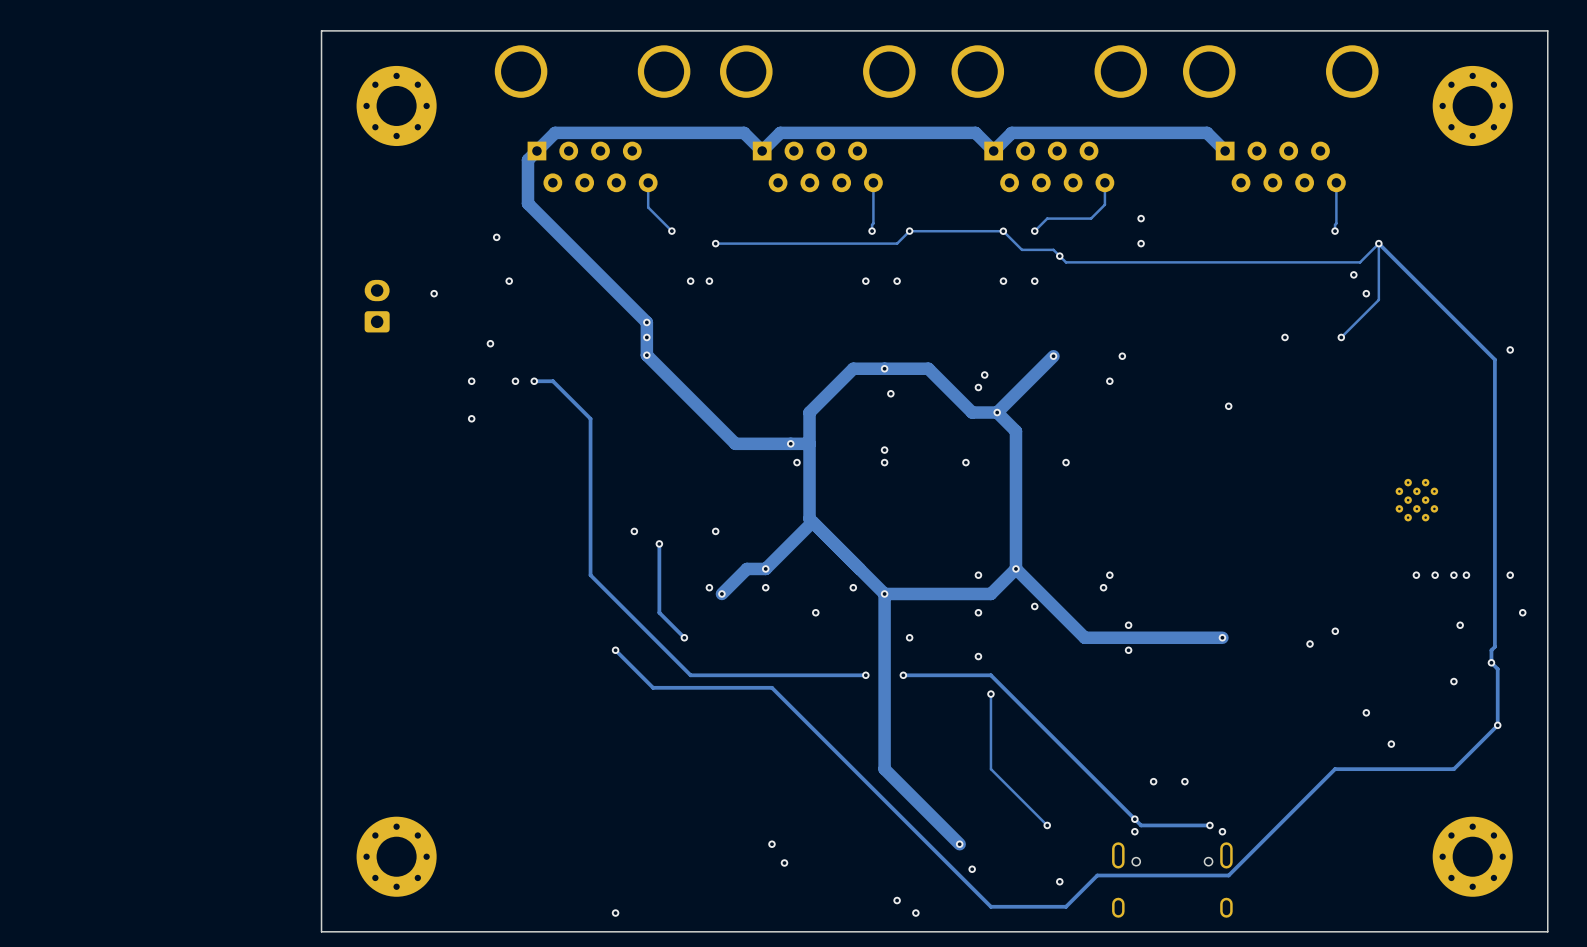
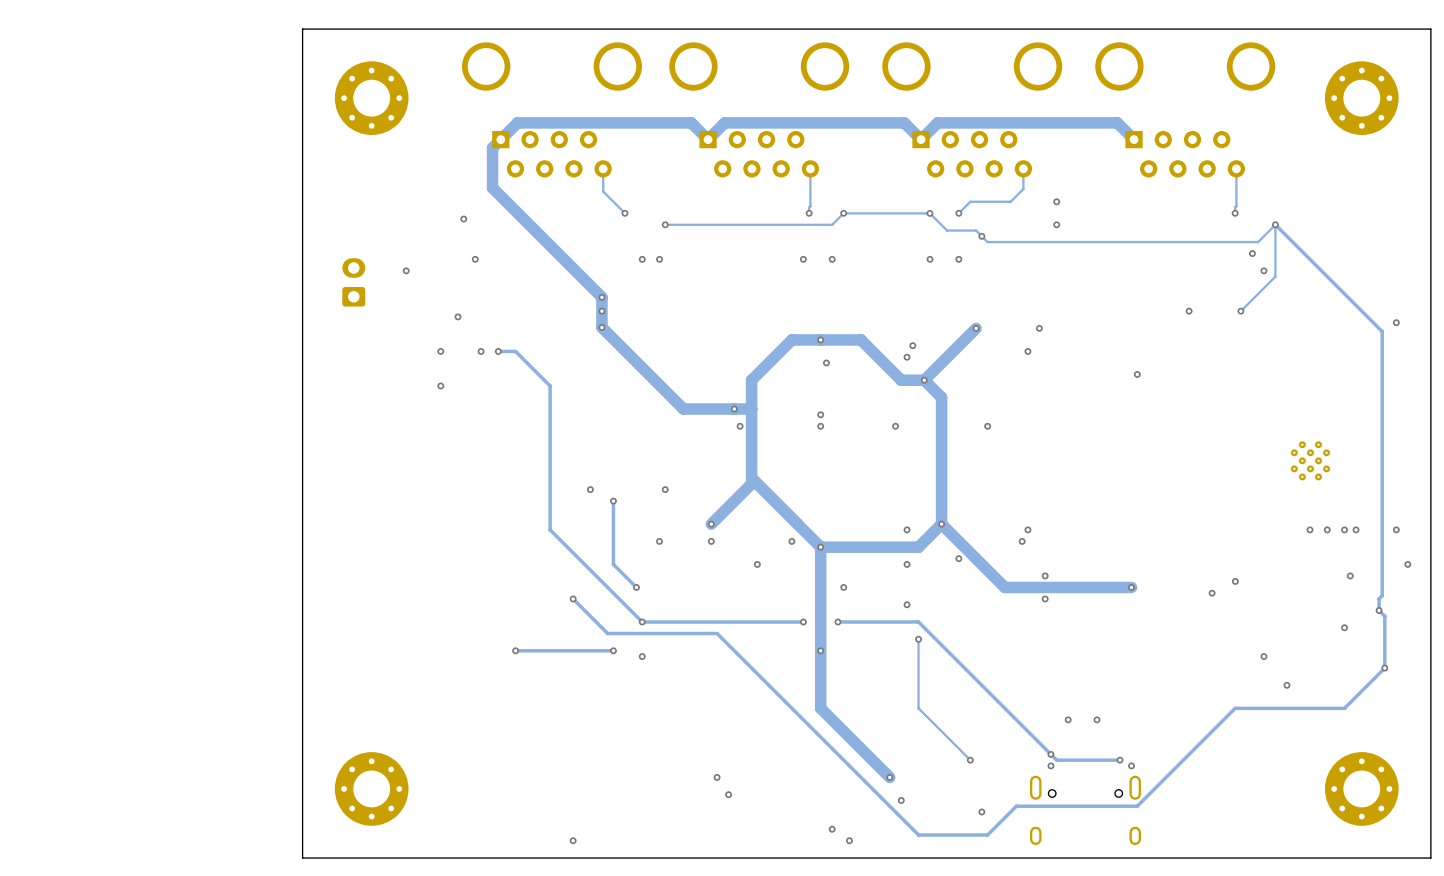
track: (765, 568) (746, 568) (721, 593) -> none
via: (721, 593) -> none
via: none -> (642, 622)
via: none -> (515, 650)
track: none -> (613, 650) (515, 650)
via: none -> (613, 650)
via: none -> (820, 650)
via: none -> (642, 656)

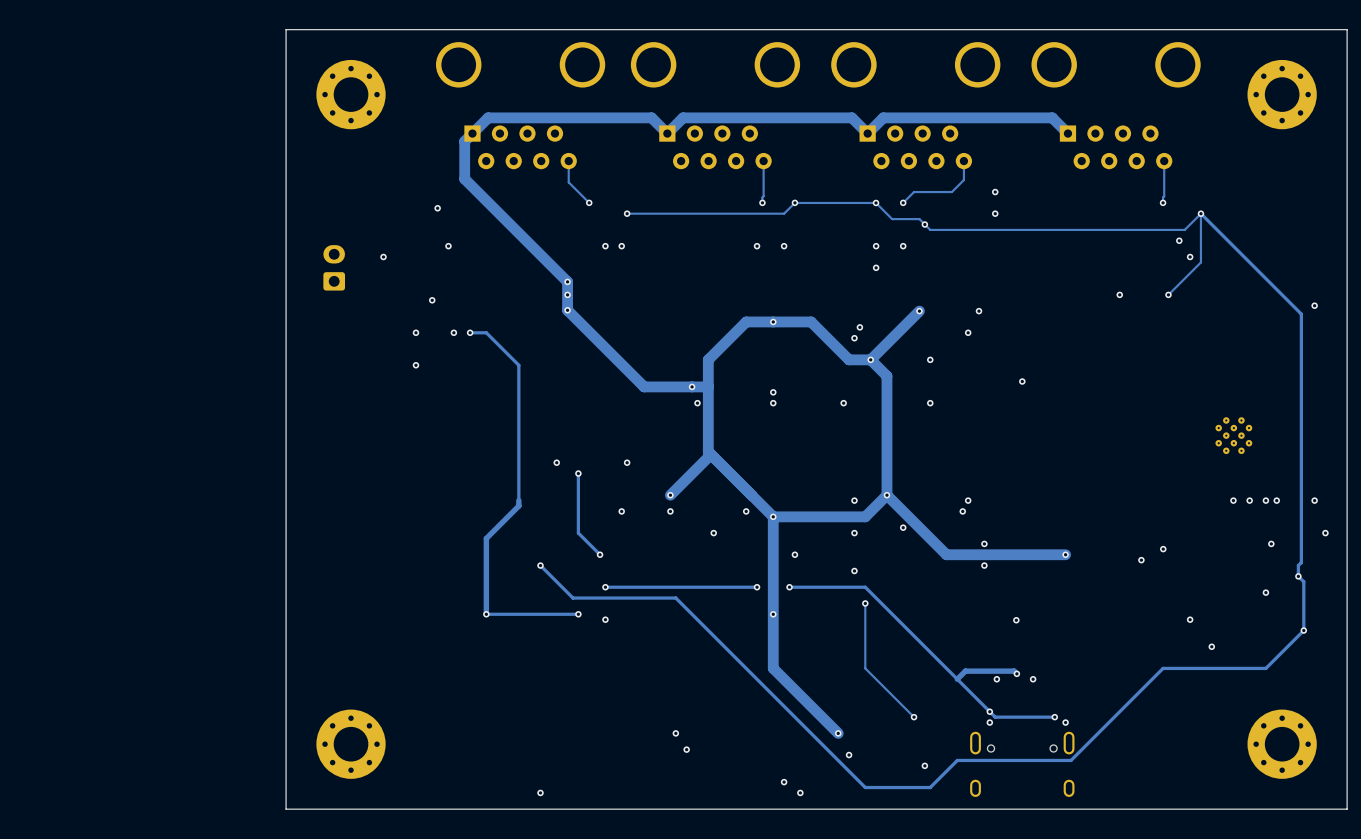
via: none -> (876, 267)
via: (826, 362) -> none
via position: (1137, 374) -> (1022, 381)
via: none -> (930, 359)
track: (550, 529) (642, 622) -> (518, 500) (518, 506) (486, 538) (486, 614)
via: none -> (1016, 620)
track: none -> (1015, 672) (1016, 673) (1014, 671) (965, 671) (957, 679)
via: none -> (1016, 673)
via: none -> (996, 679)
via: (1068, 719) -> none

